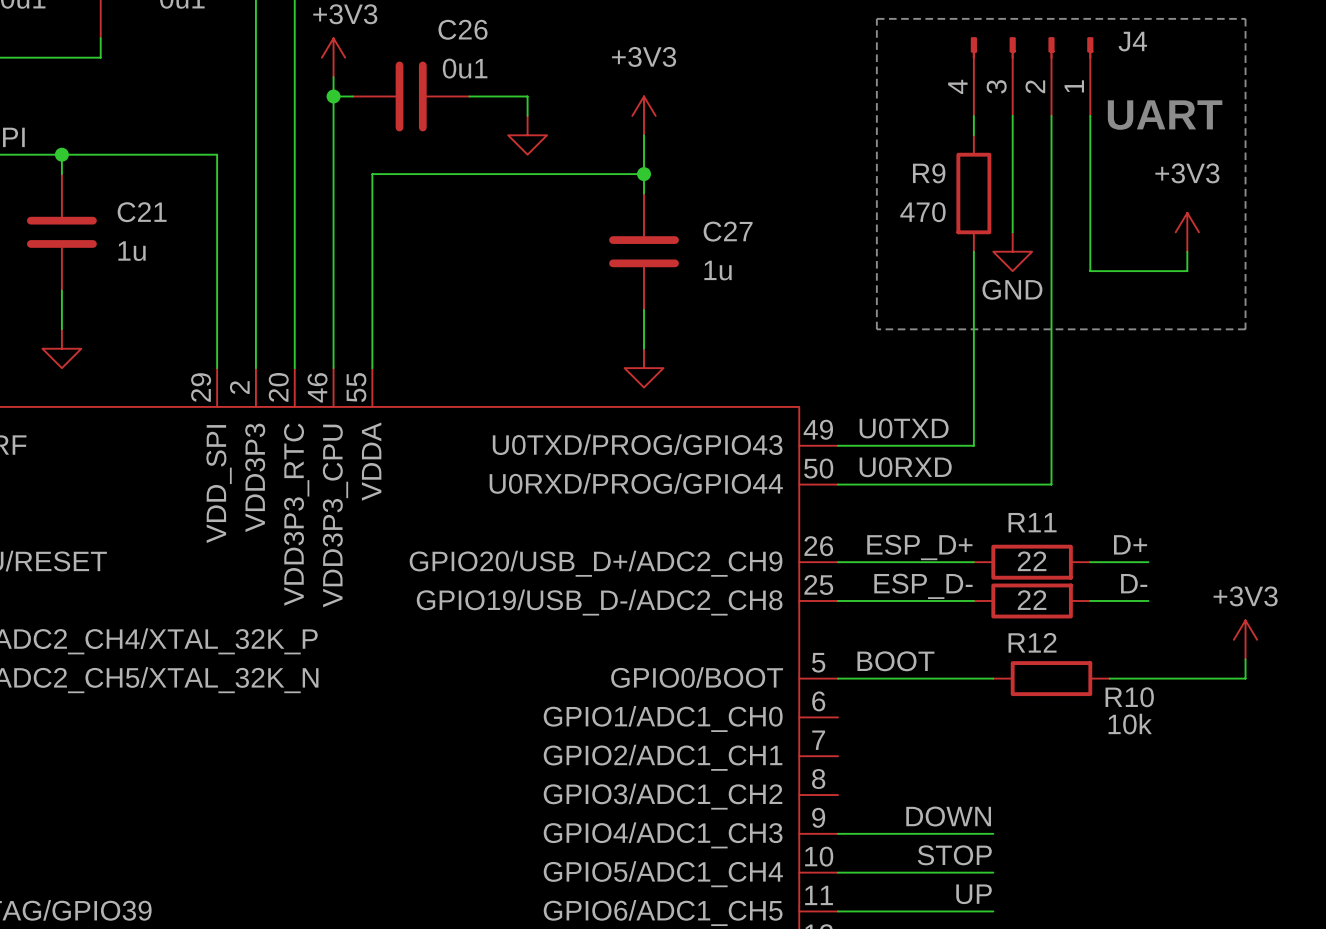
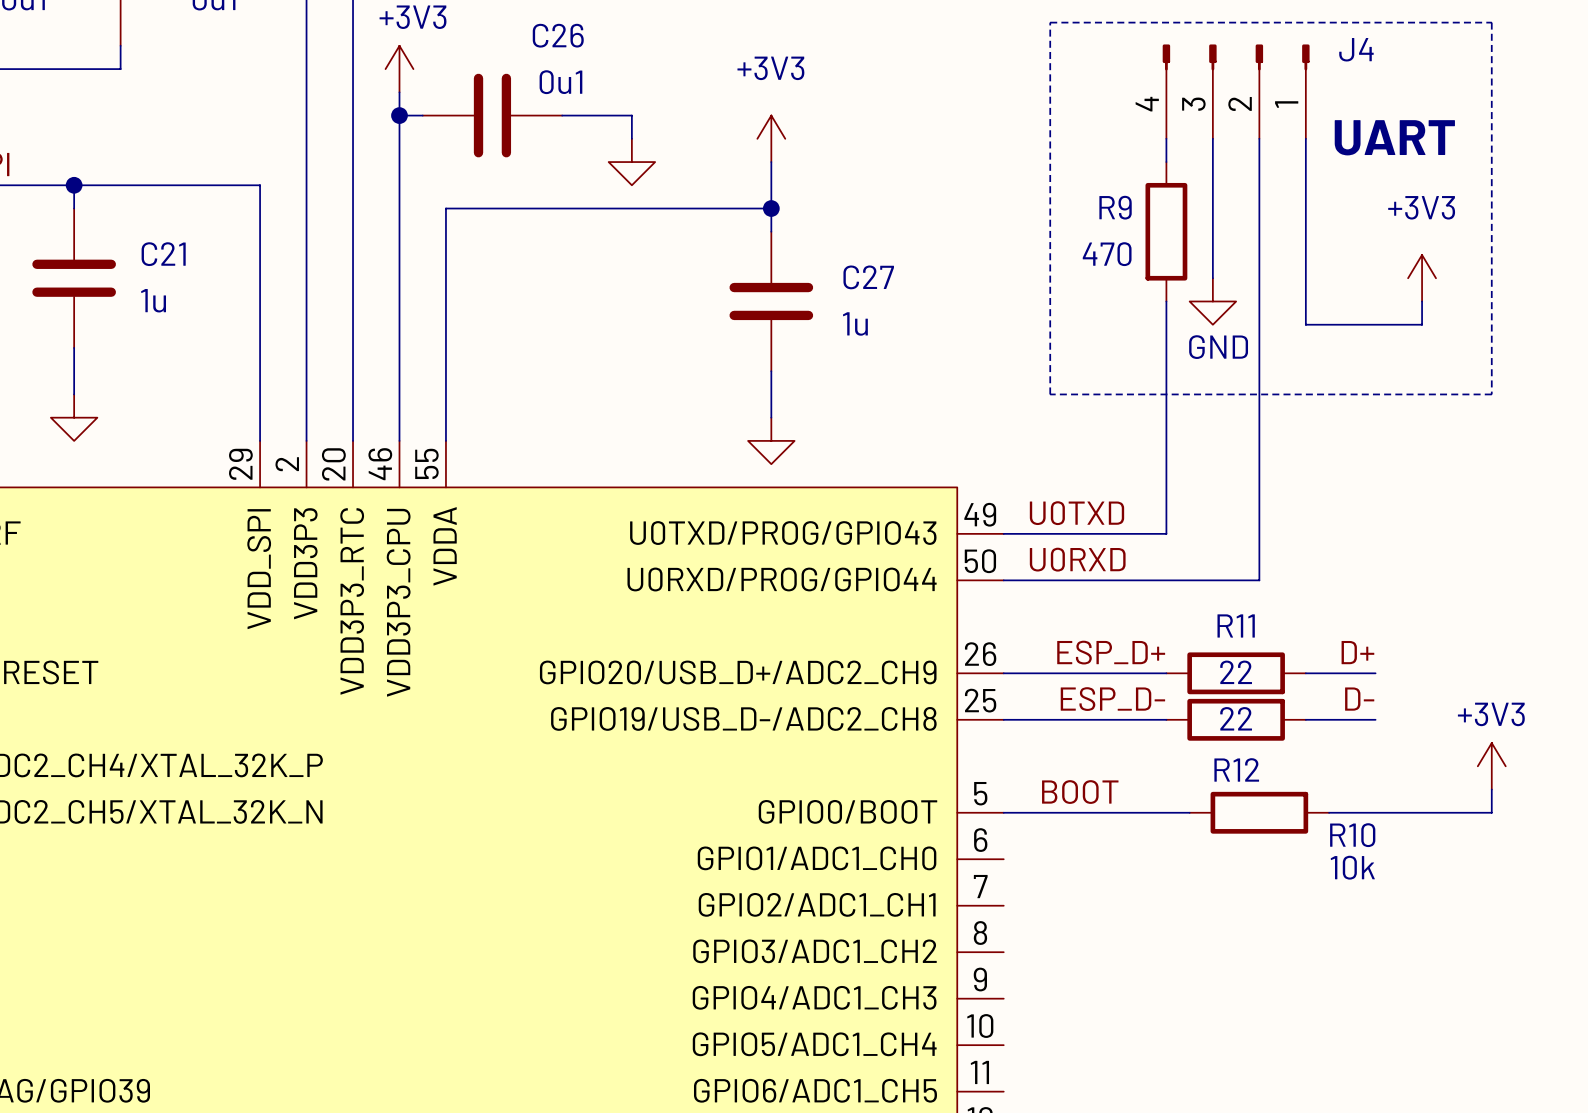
label: DOWN (948, 816) -> none
wire: (838, 833) (993, 833) -> none
label: STOP (954, 855) -> none
wire: (838, 872) (993, 872) -> none
label: UP (974, 894) -> none
wire: (838, 911) (993, 911) -> none

